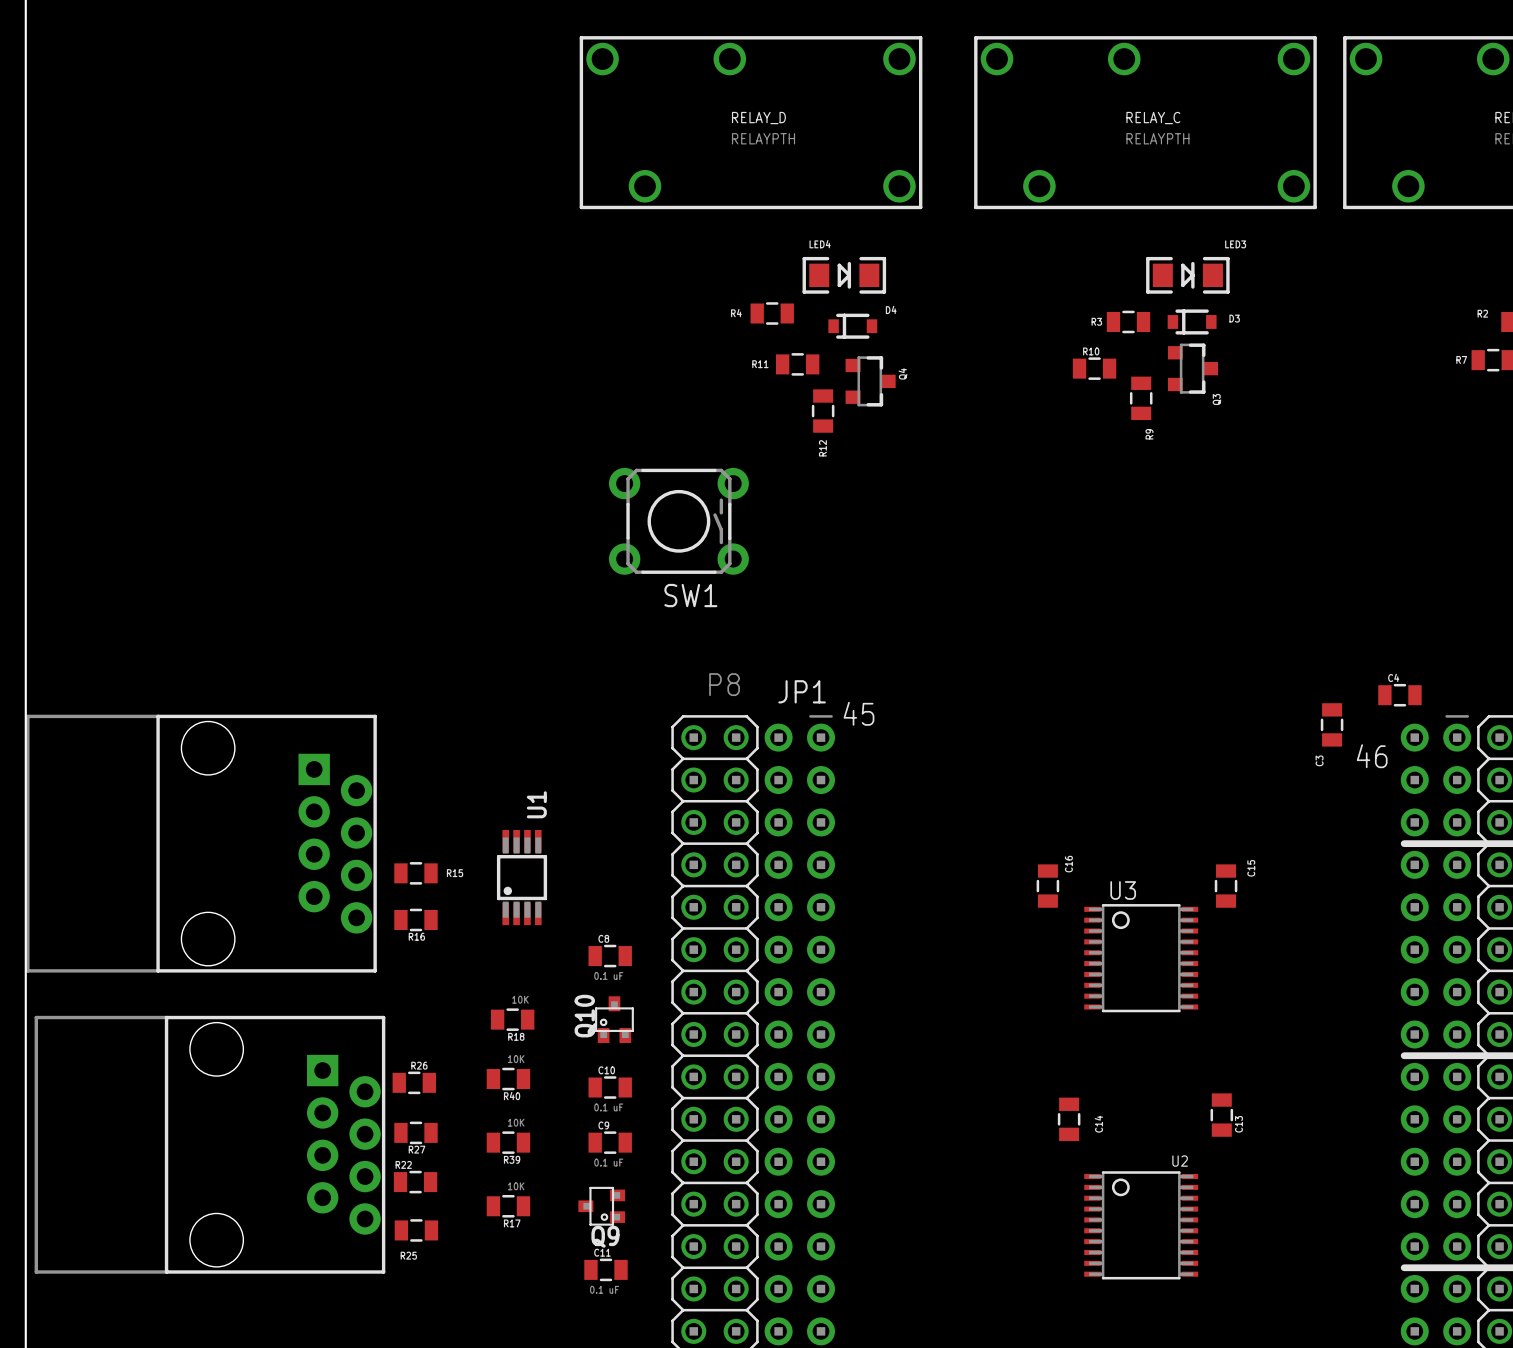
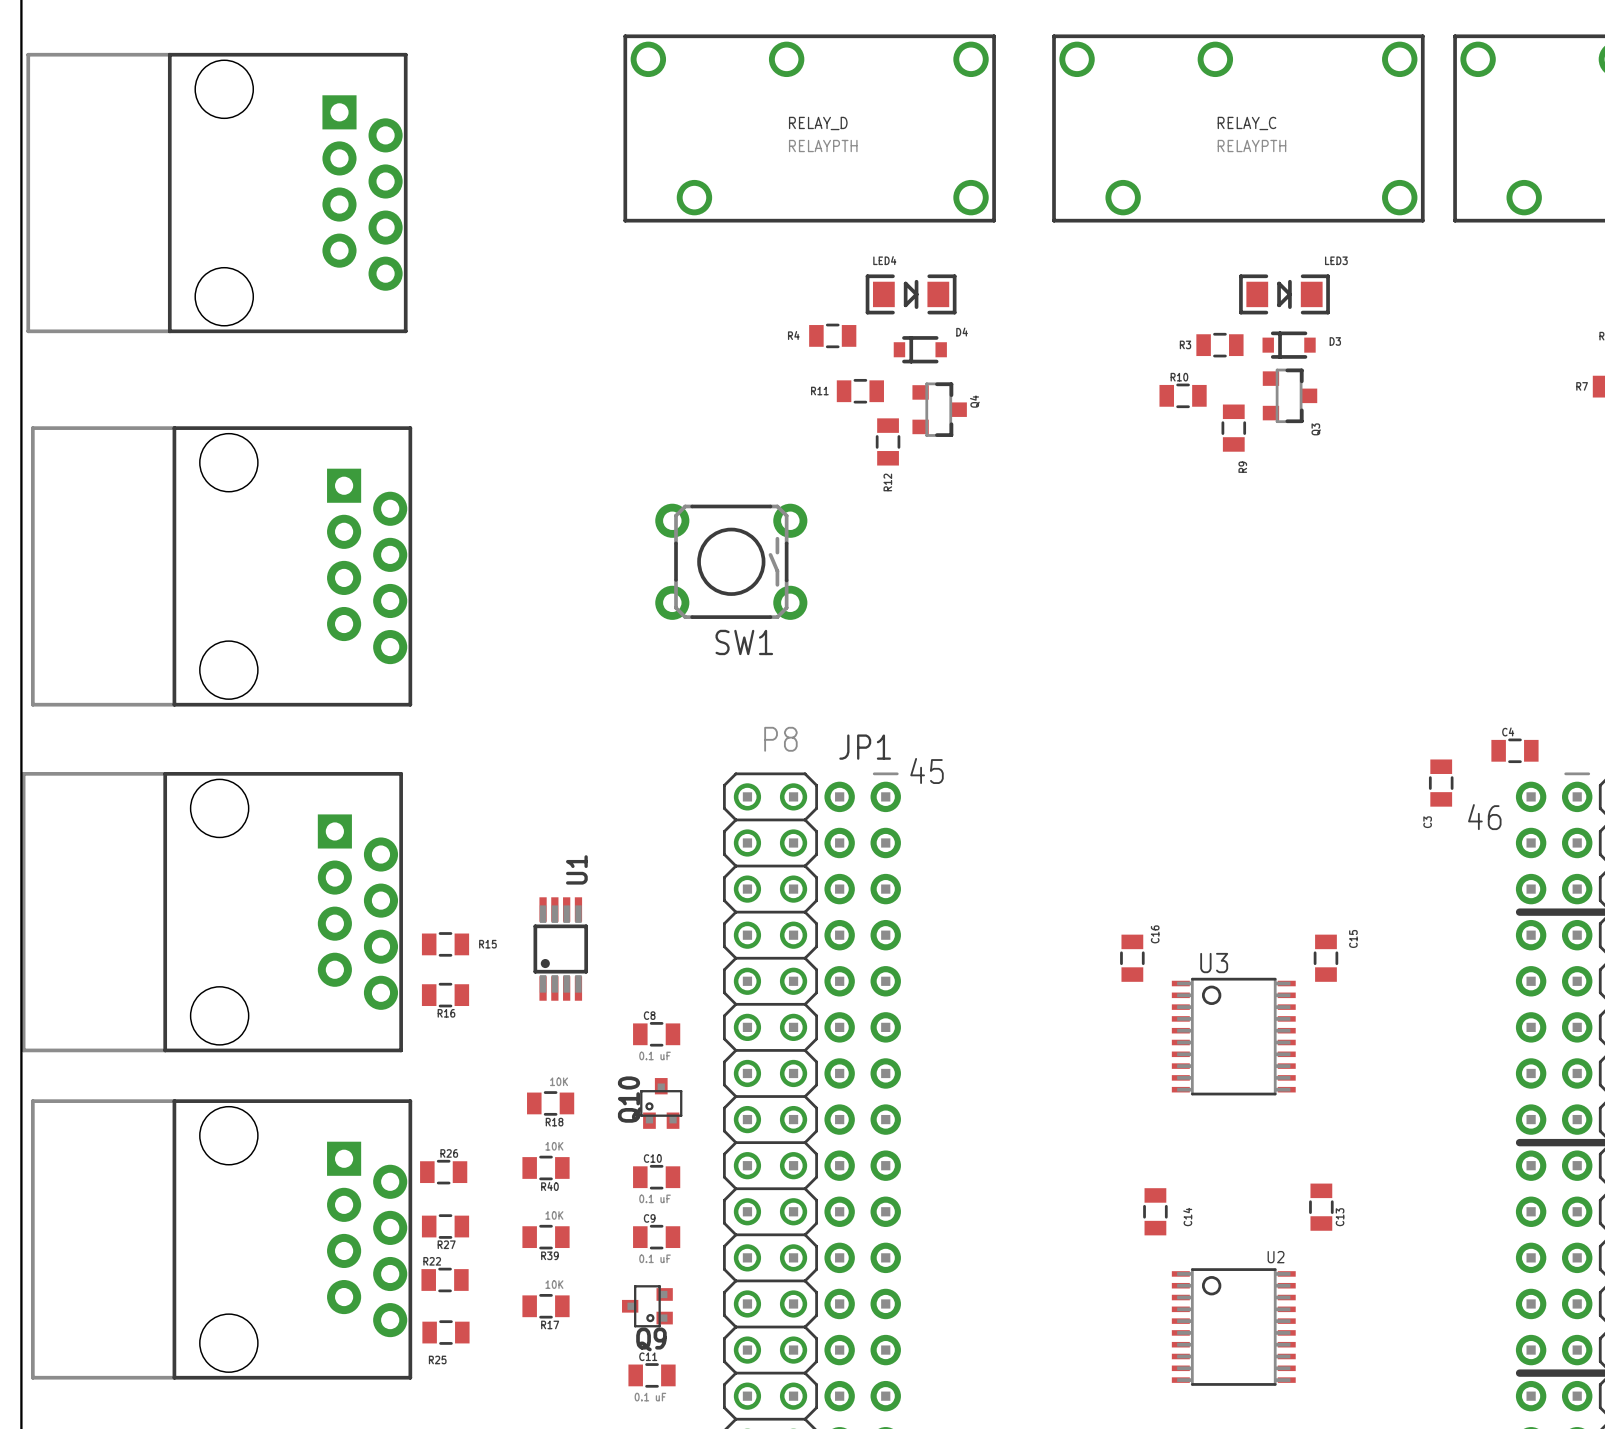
part: none -> (216, 193)
part: none -> (221, 566)

